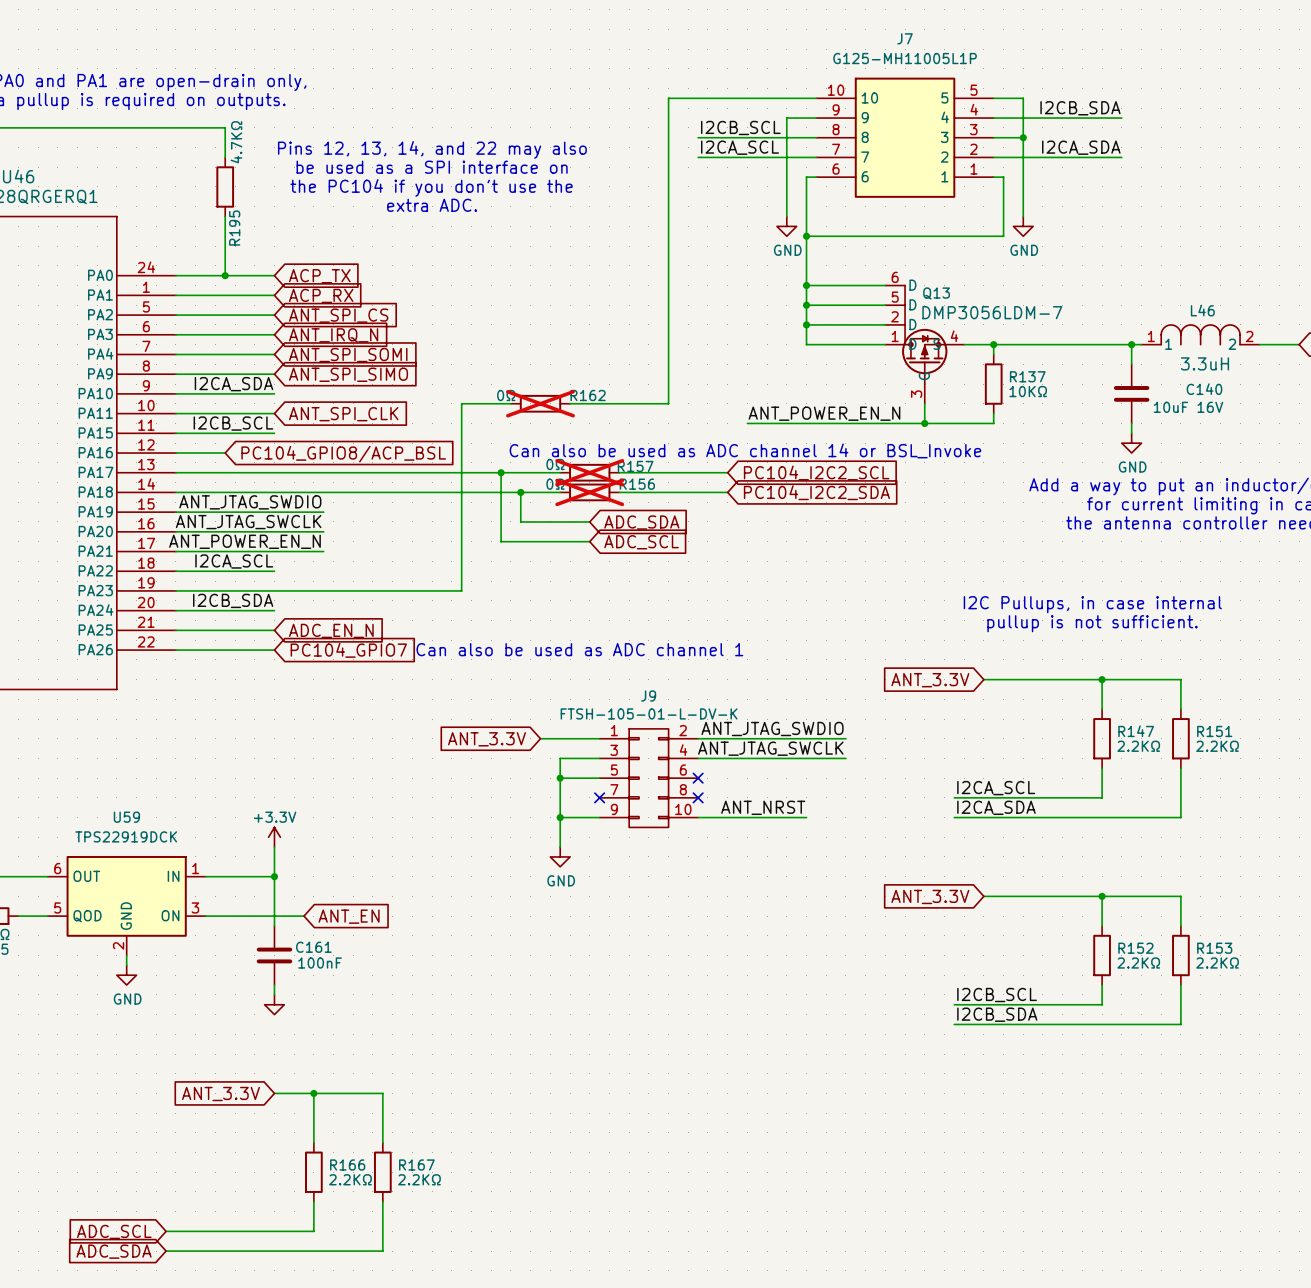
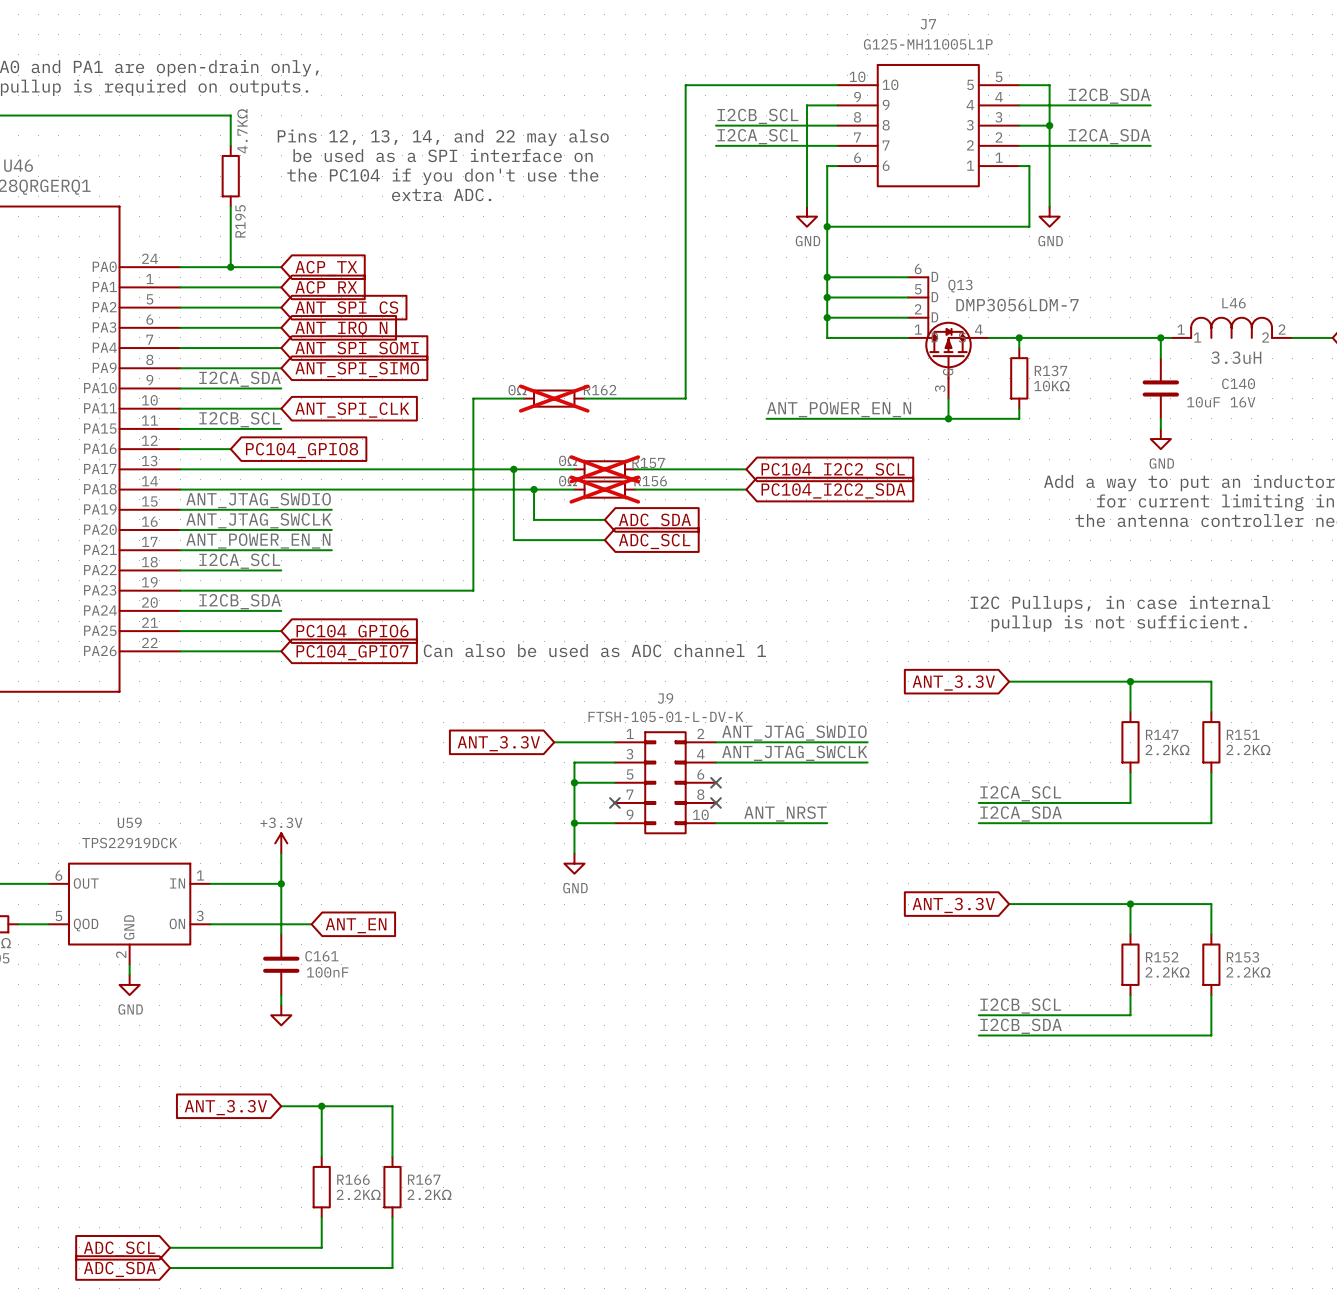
text: Can also be used as ADC channel 14 or BSL_Invoke (745, 450) -> none
global label: PC104_GPIO8/ACP_BSL (343, 454) -> PC104_GPIO8 (302, 450)
global label: ADC_EN_N (331, 630) -> PC104_GPIO6 (352, 632)

